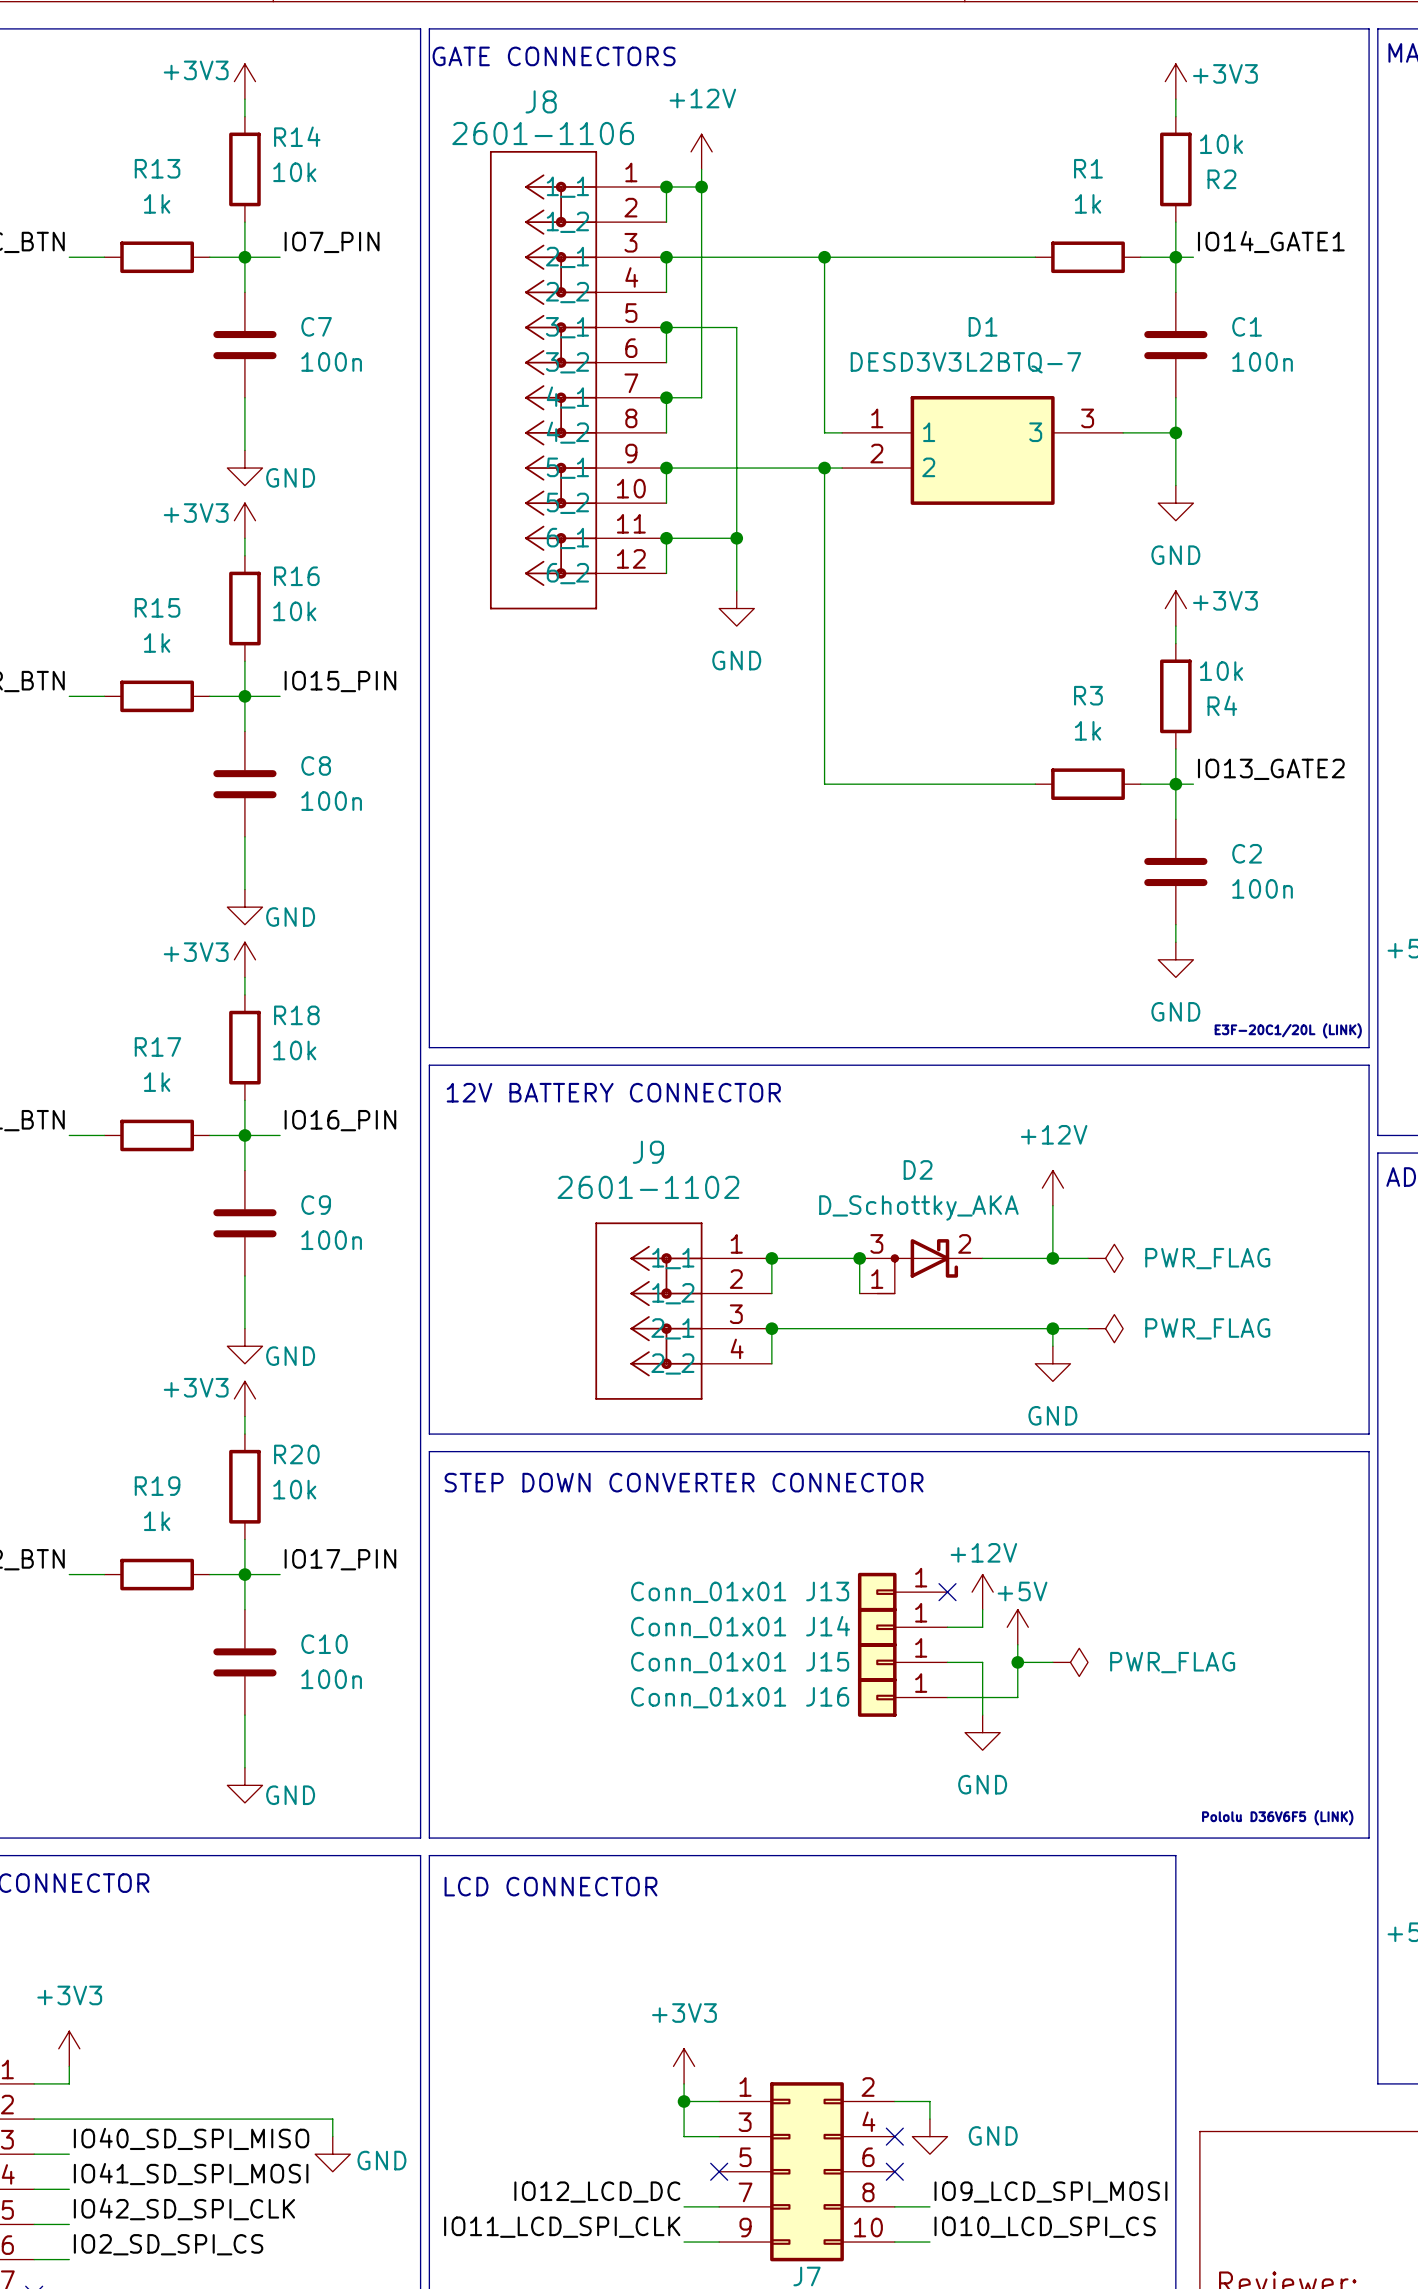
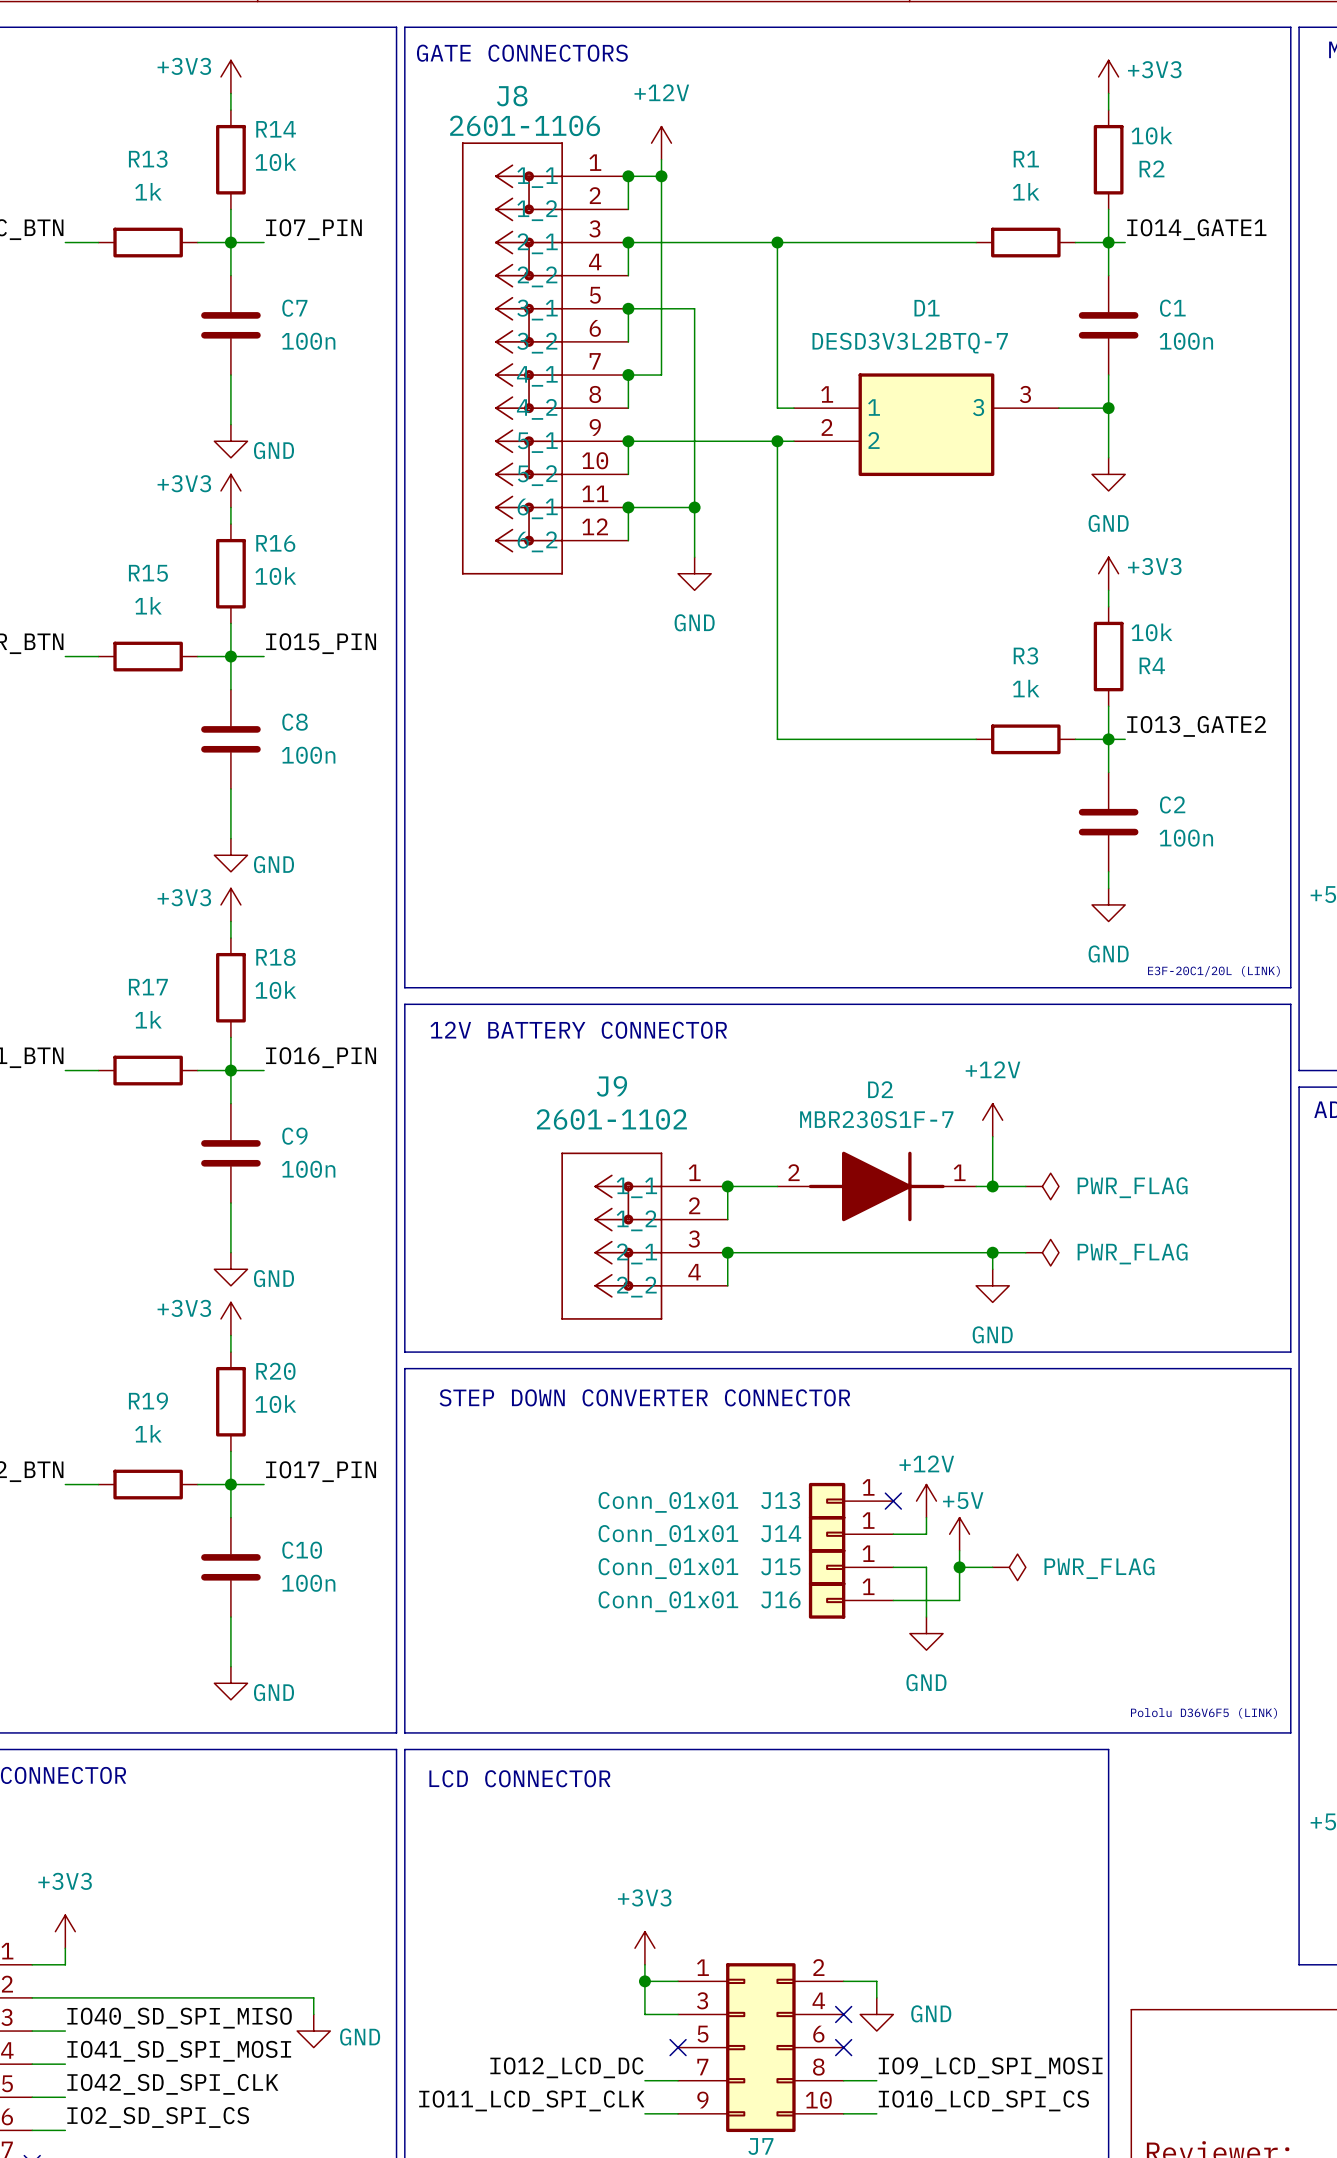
D2 value: D_Schottky_AKA (918, 1207) -> MBR230S1F-7 (876, 1119)
D2 symbol: [859, 1239, 983, 1294] -> [777, 1151, 977, 1222]
wire: (824, 1258) (859, 1258) (859, 1293) -> none
junction: (859, 1258) -> none

